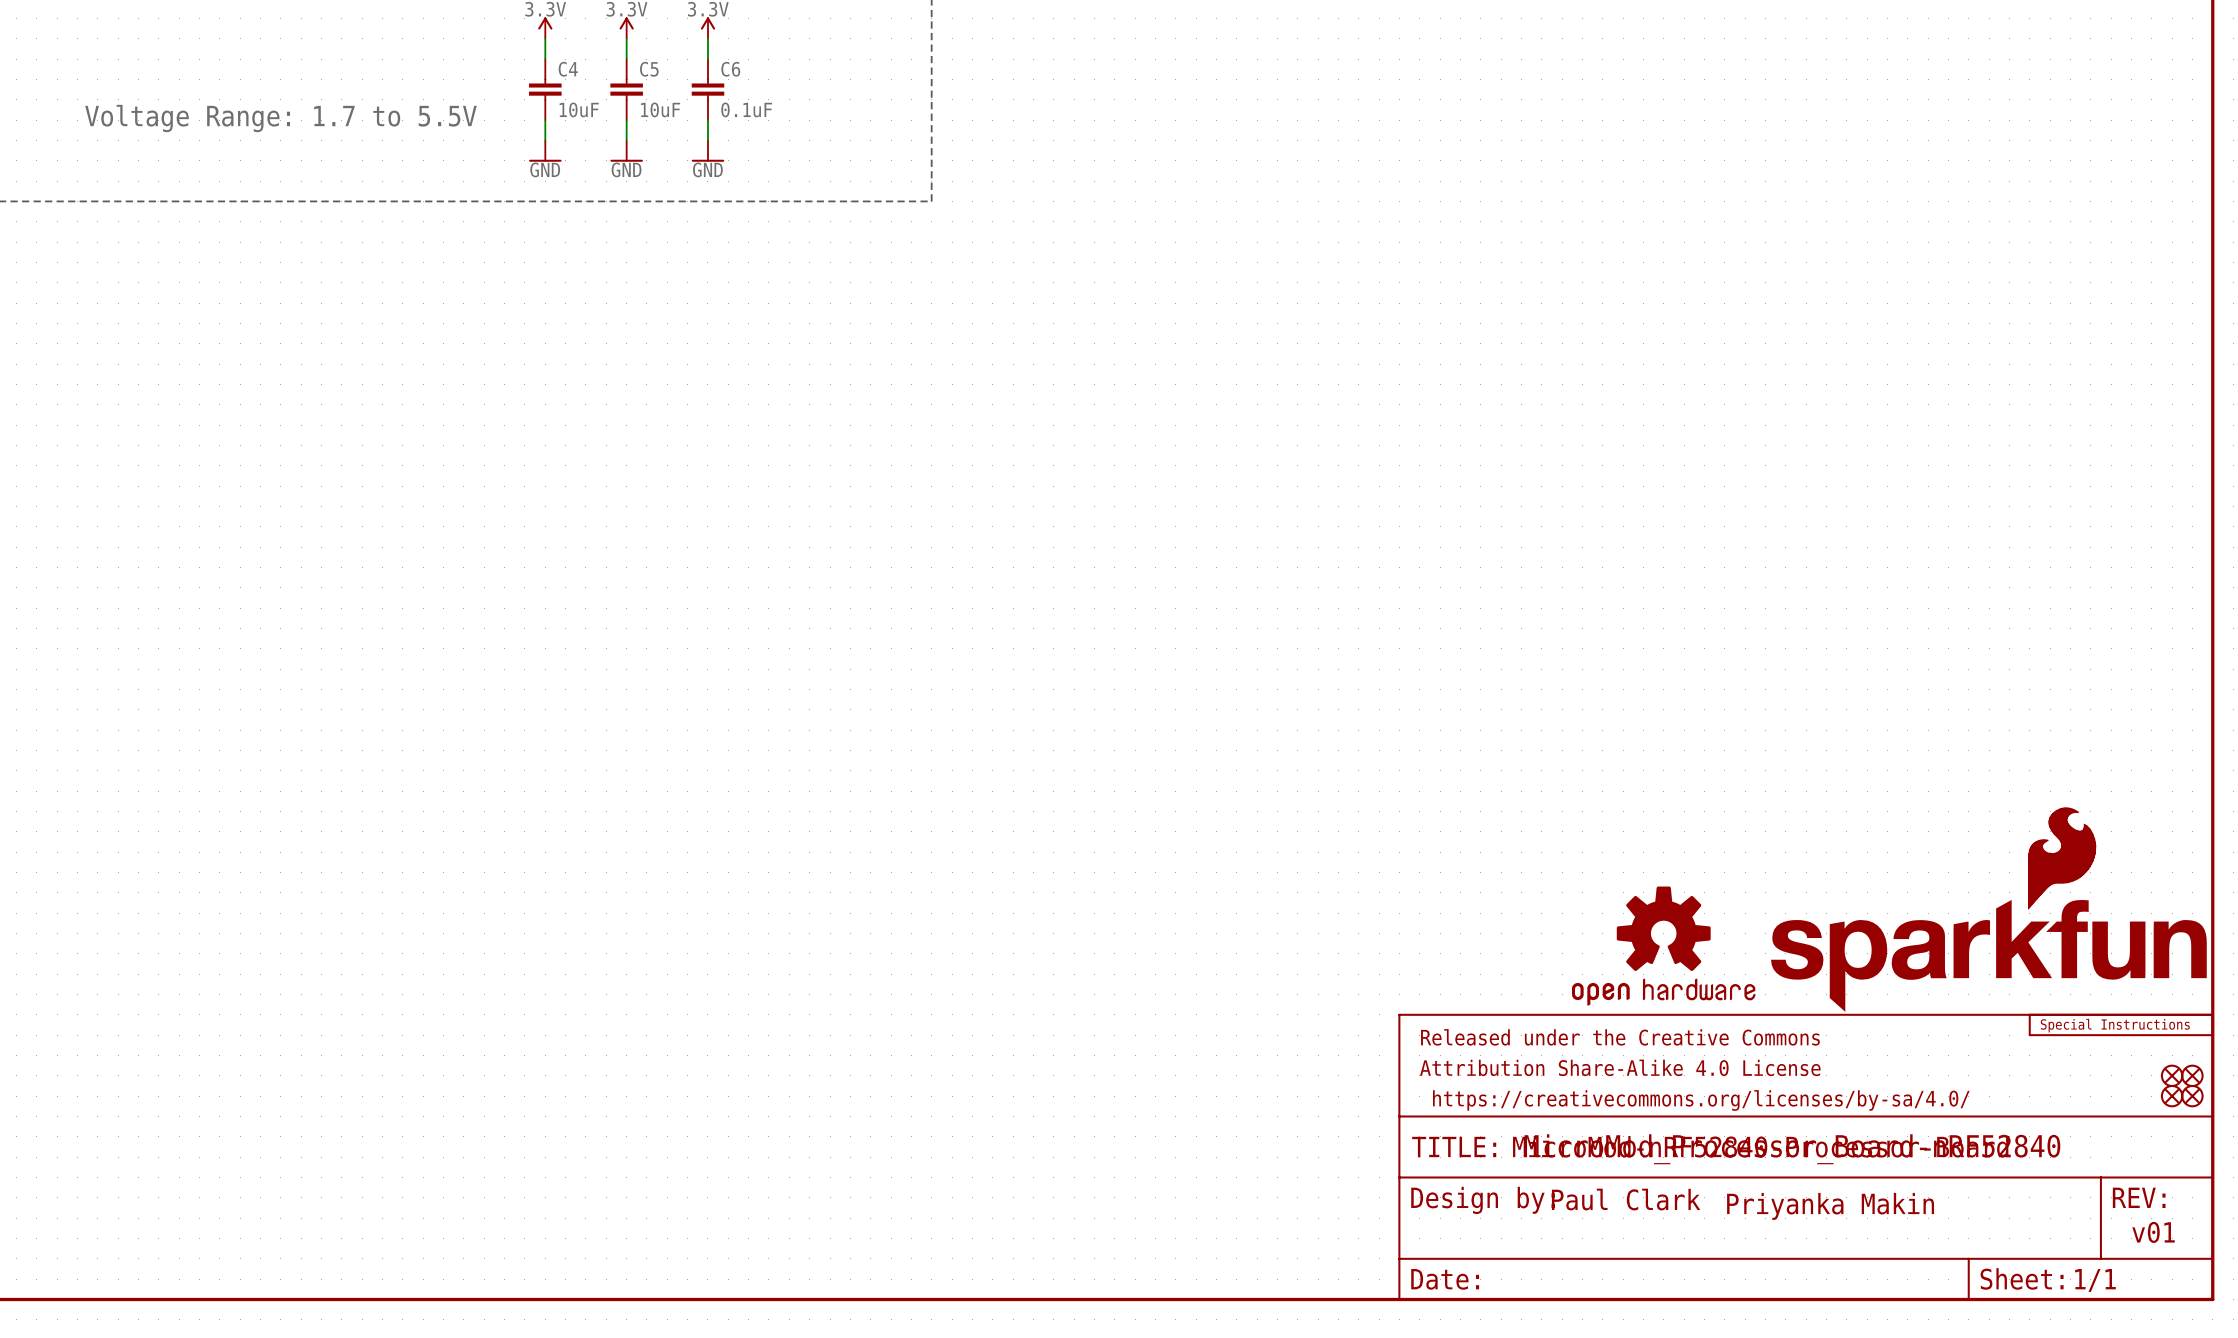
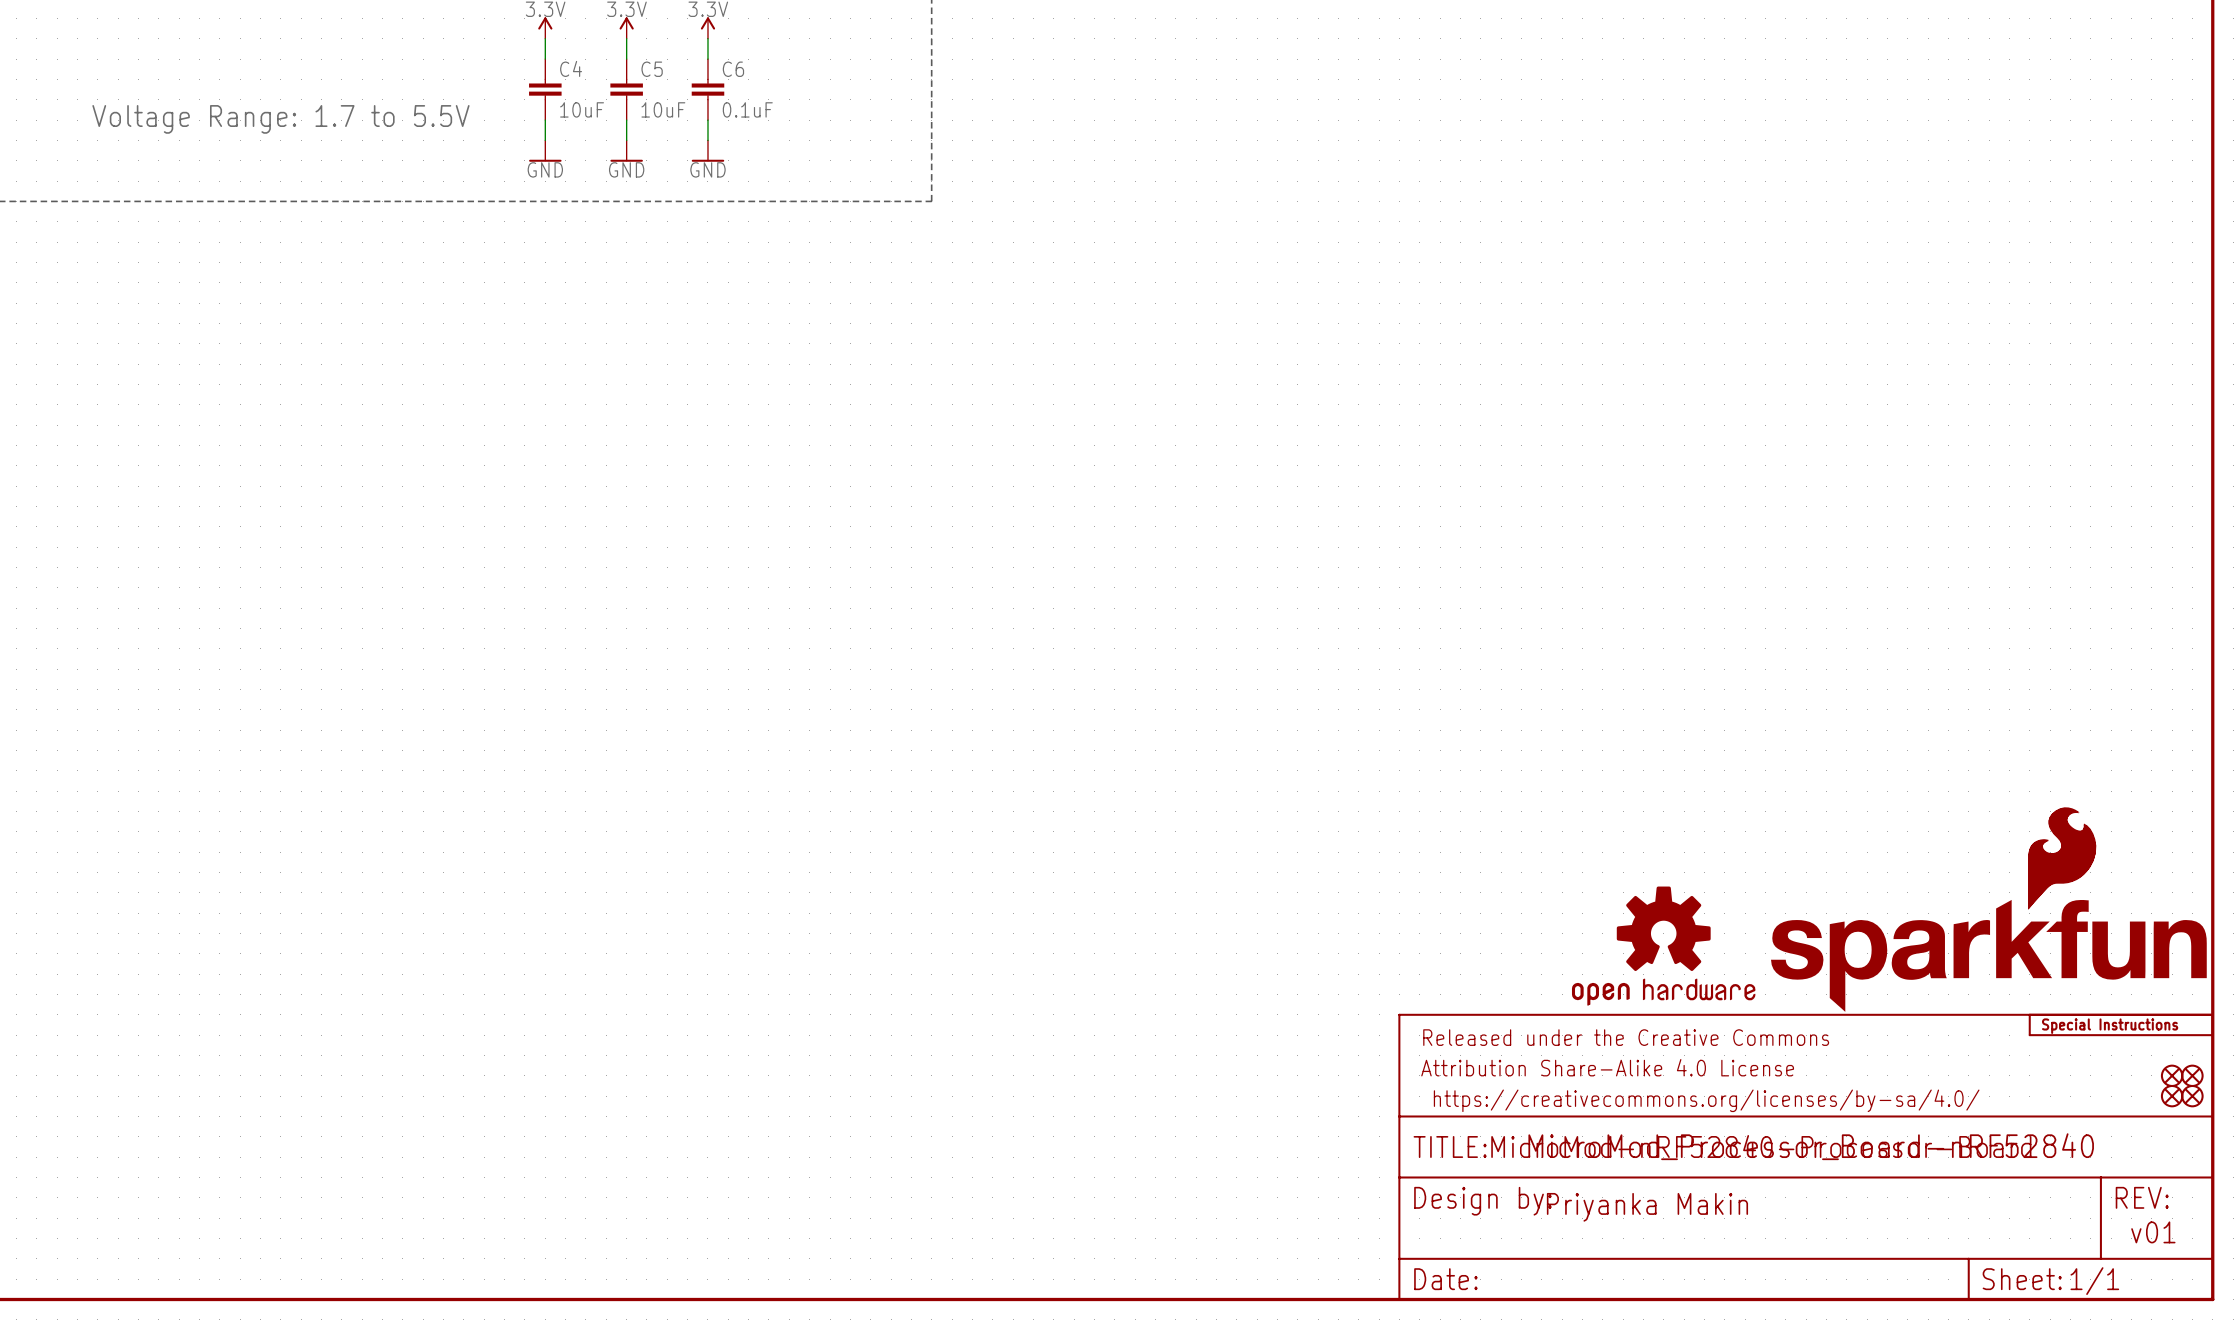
text: Paul Clark (1626, 1199) -> none
text position: Priyanka Makin (1830, 1206) -> Priyanka Makin (1647, 1207)

